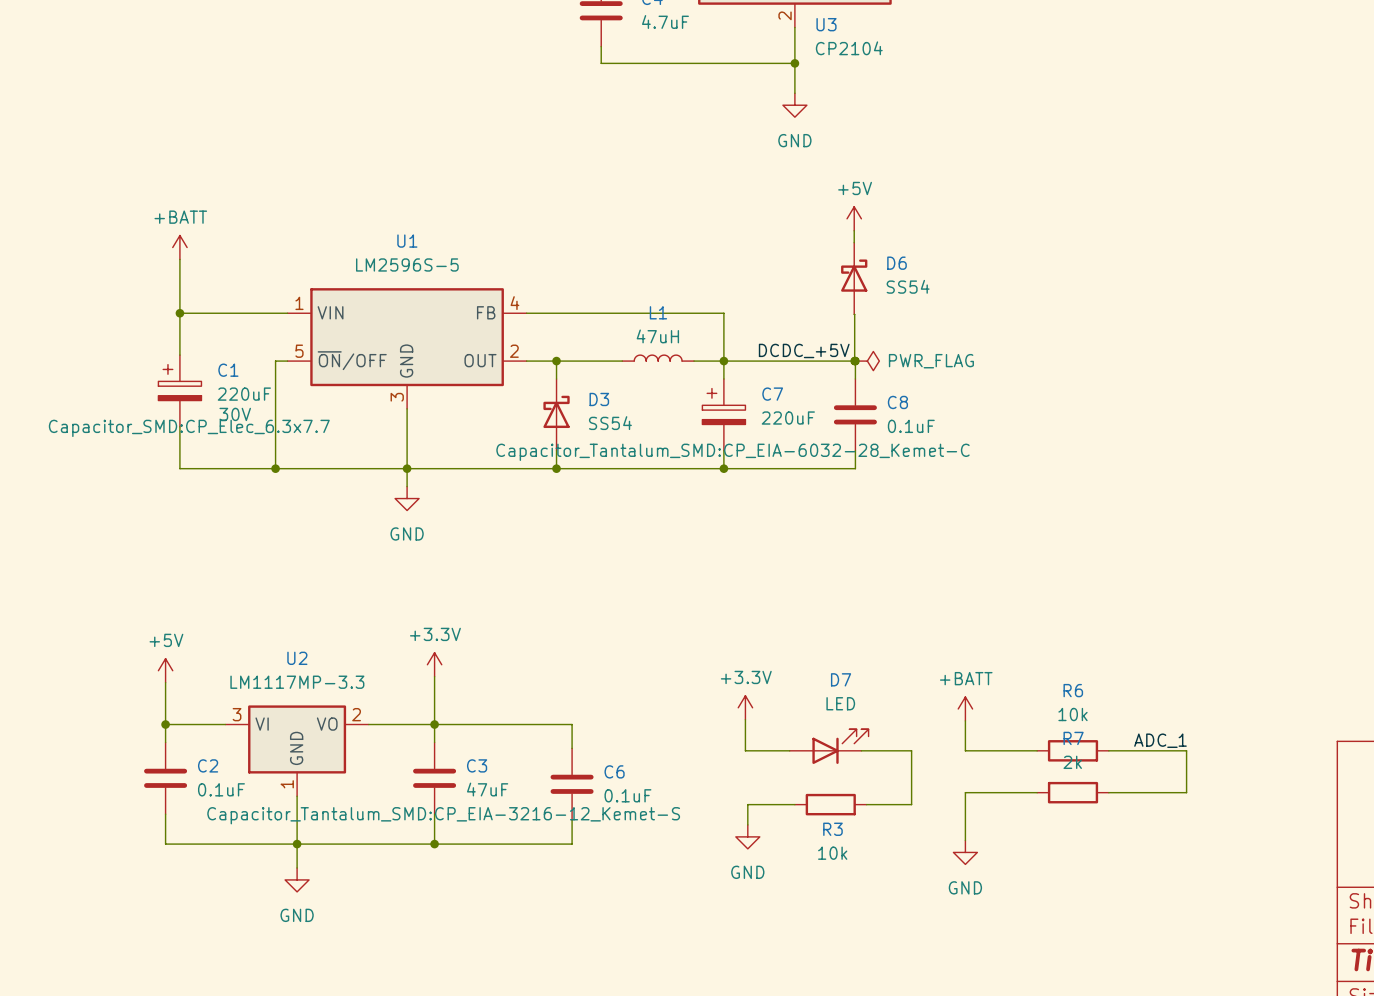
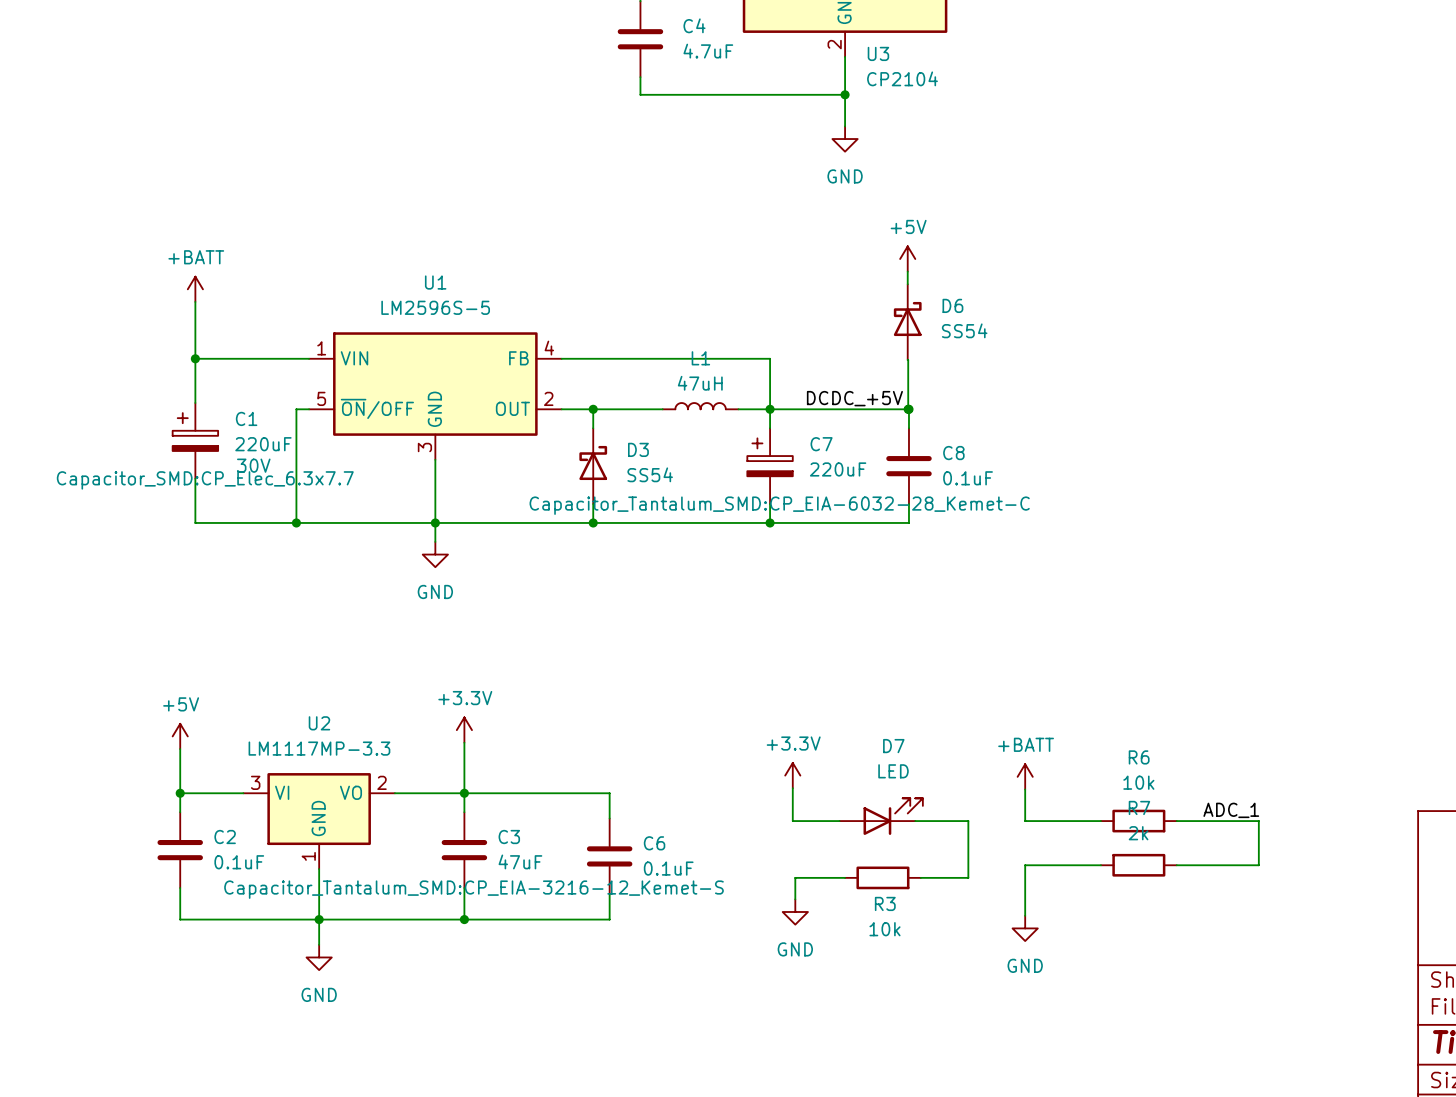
power symbol: PWR_FLAG (867, 361) -> none

